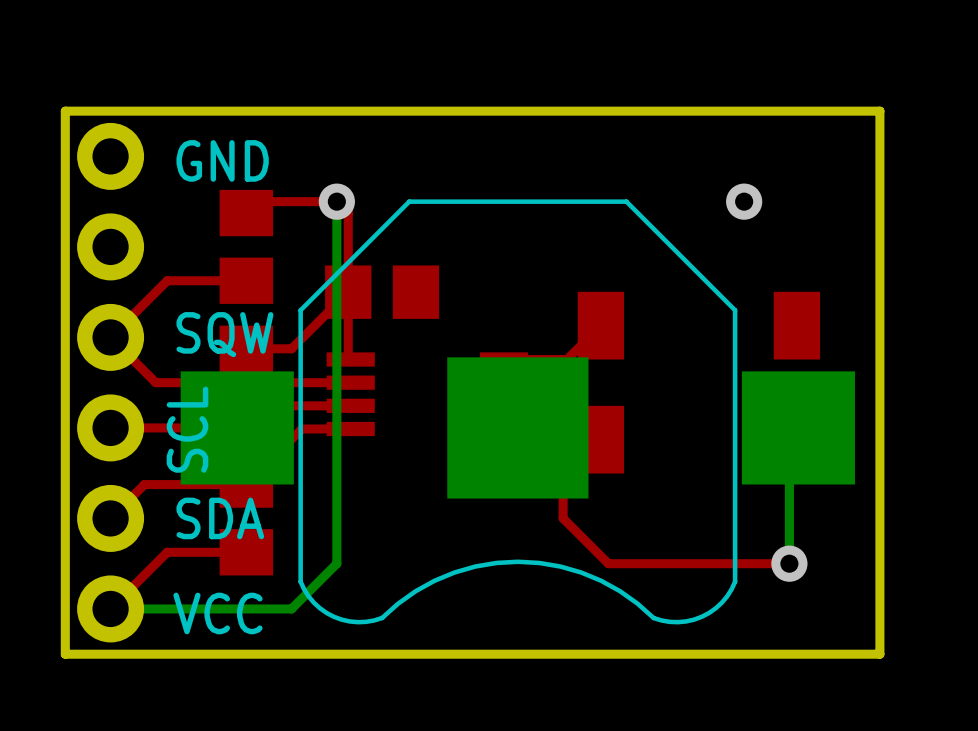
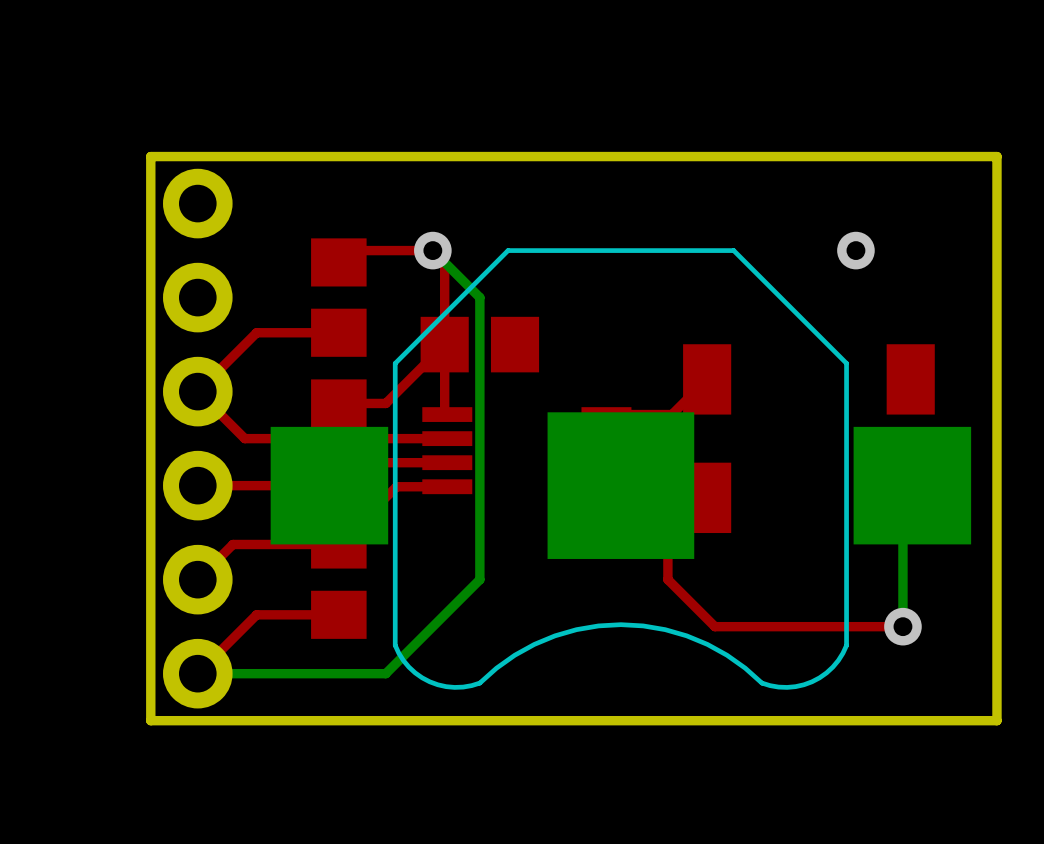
text: GND (222, 160) -> none
bottom track: (336, 201) (336, 563) -> (432, 250) (479, 297) (479, 579) (432, 626)
text: SQW (224, 334) -> none
text: SCL (187, 429) -> none
text: SDA (220, 518) -> none
text: VCC (217, 613) -> none

